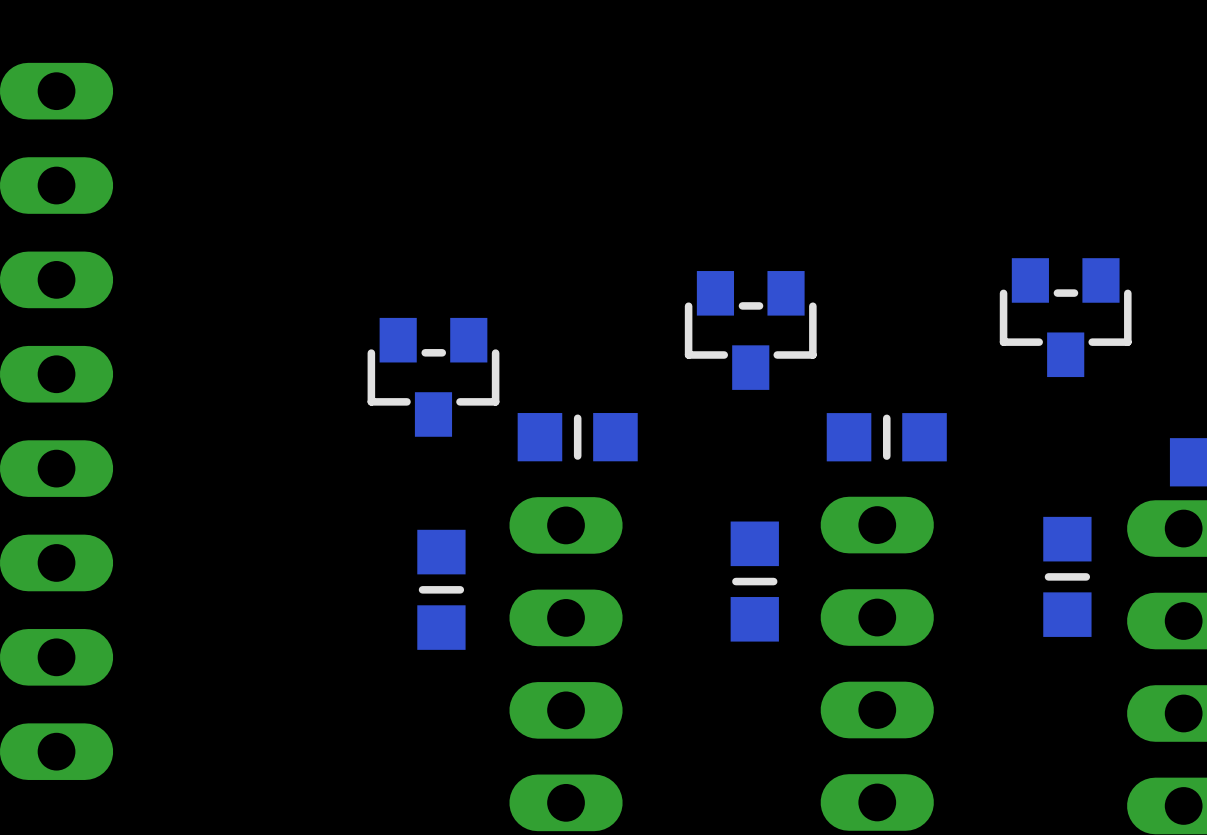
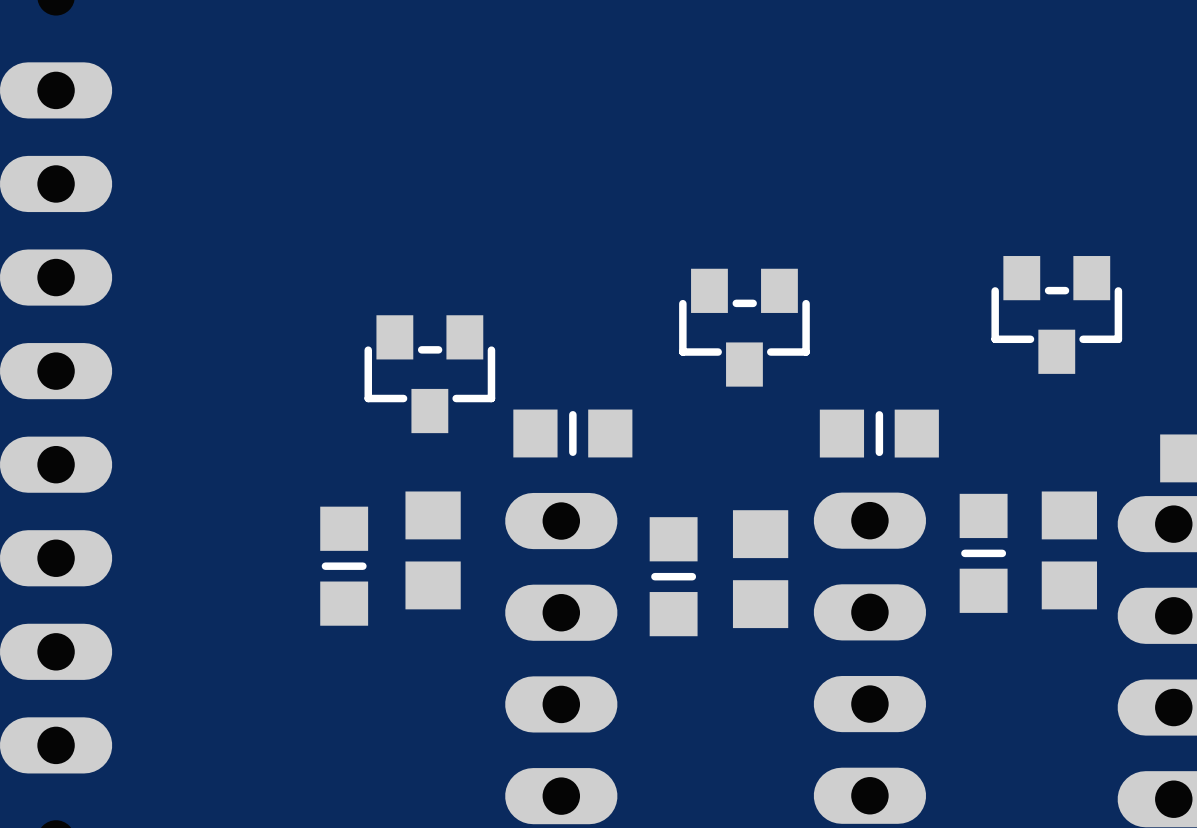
part footprint: [1043, 516, 1092, 637] -> [1041, 491, 1098, 610]
part footprint: [730, 521, 779, 642] -> [732, 510, 789, 629]
part footprint: [417, 529, 466, 650] -> [405, 491, 461, 610]
part: none -> (983, 553)
part: none -> (344, 566)
part: none -> (673, 576)

